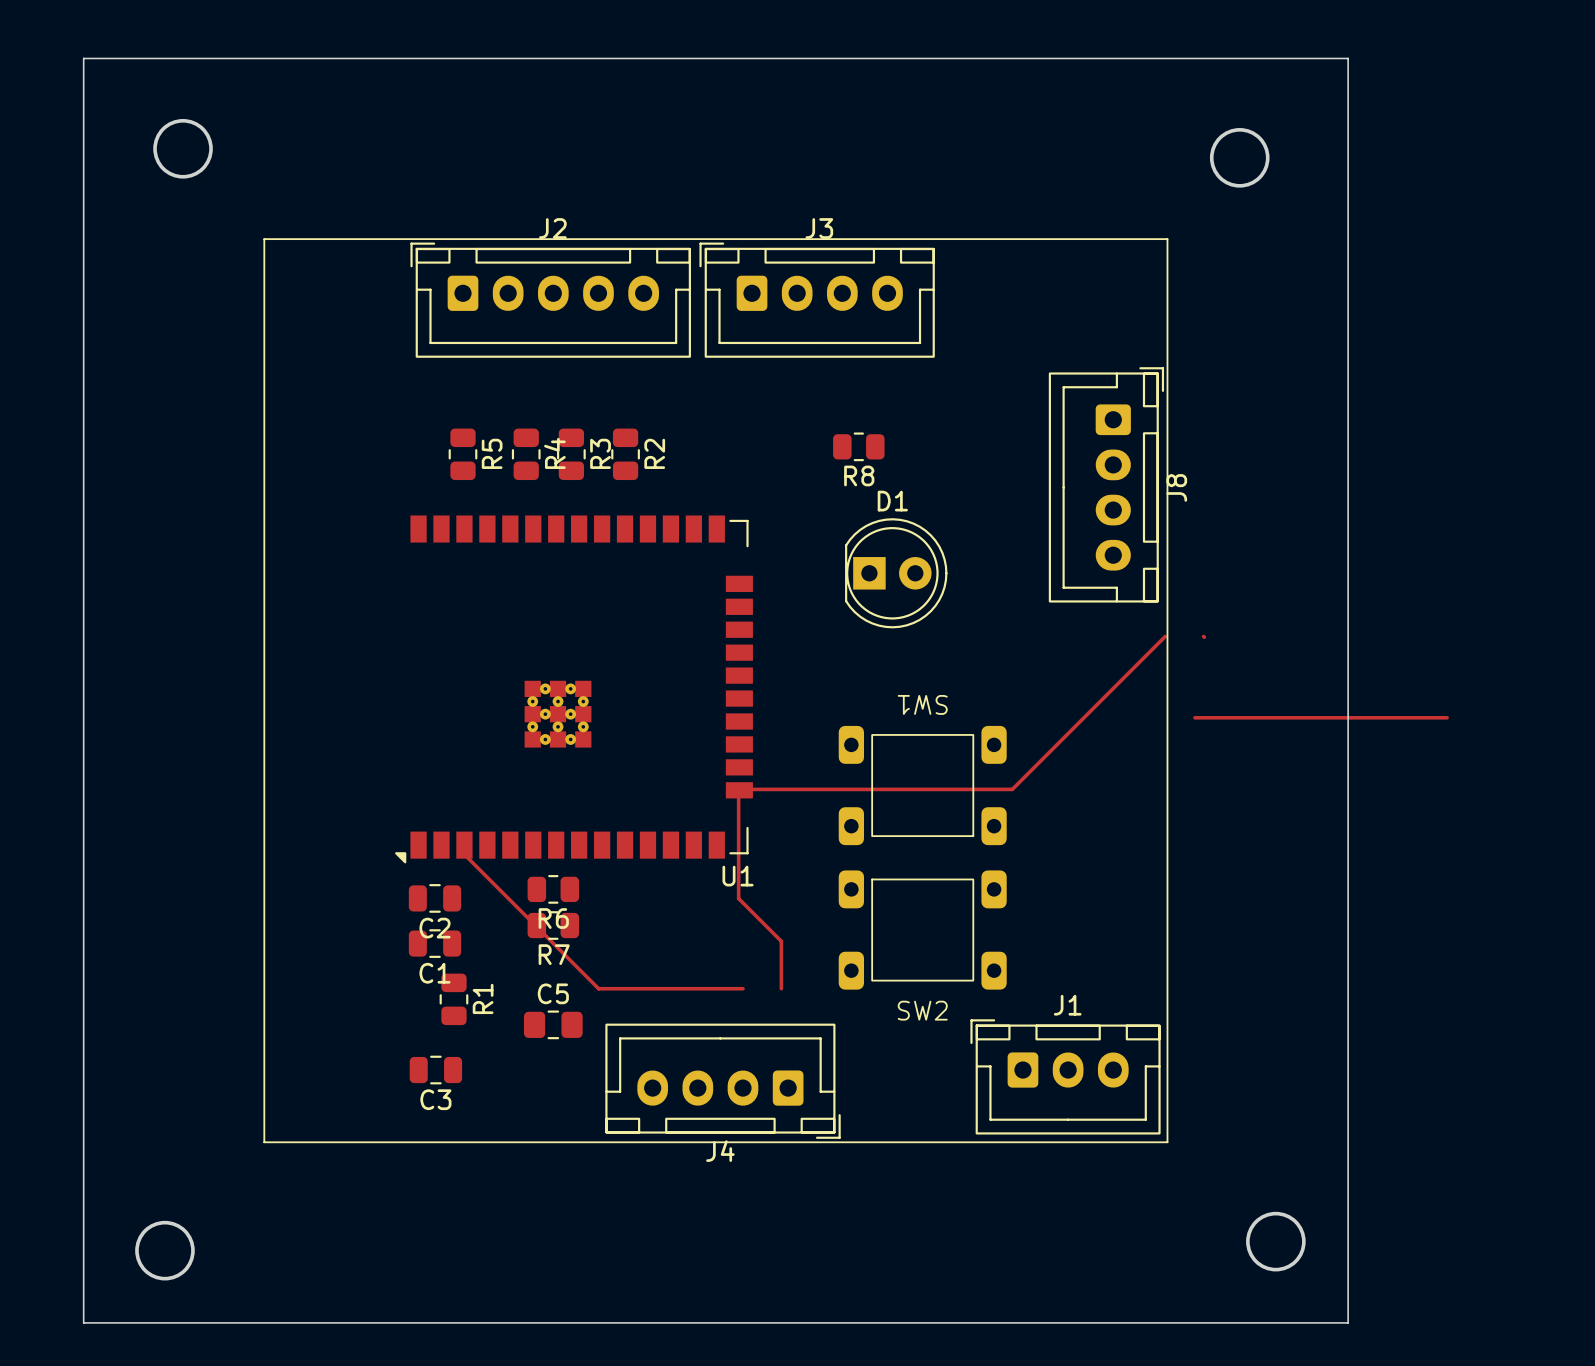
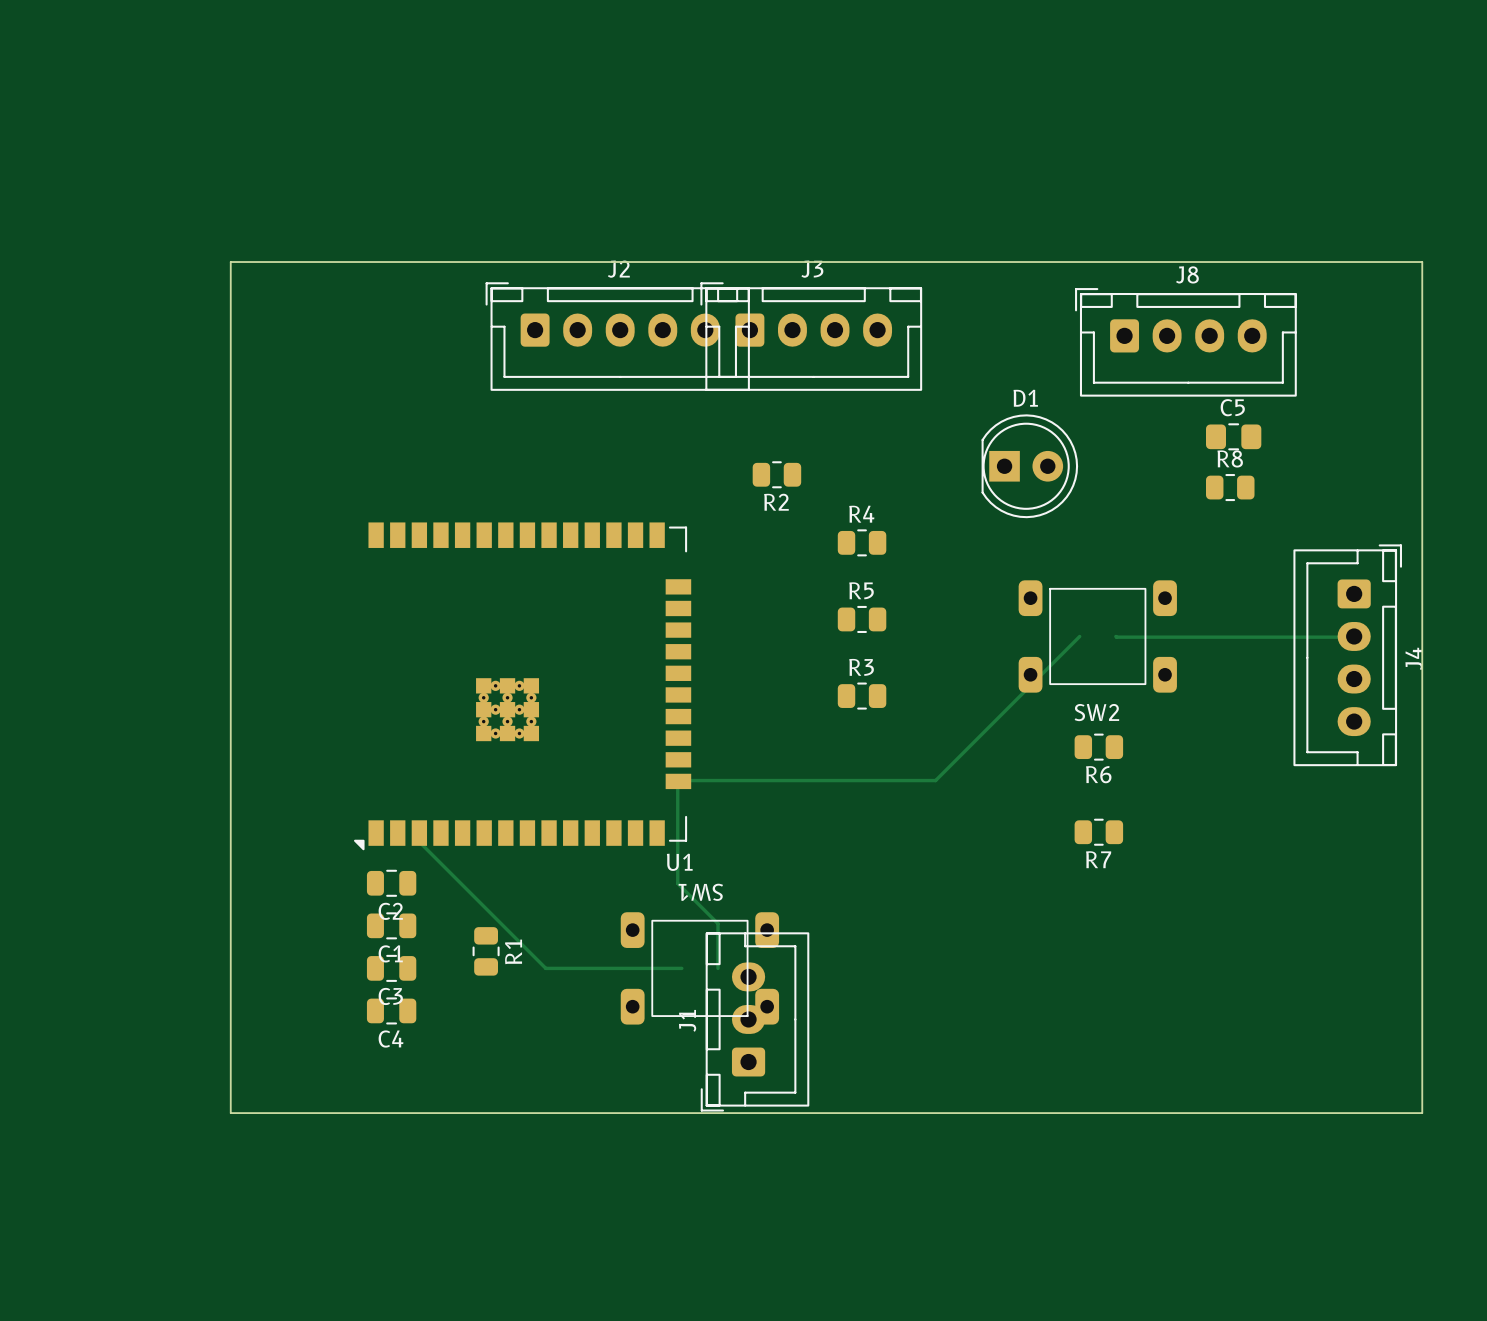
board edge: (83, 58) (1348, 58) (1348, 1322) (83, 1322) (83, 58) -> (230, 262) (230, 1113) (1422, 1113) (1422, 262) (230, 262)
round board edge: [153, 118, 213, 179] -> none
round board edge: [1209, 128, 1270, 188] -> none
line: (264, 239) (1167, 239) (1167, 1142) (264, 1142) (264, 239) -> none
J2 position: (550, 300) -> (617, 336)
J3 position: (817, 300) -> (811, 336)
R8 position: (858, 446) -> (1230, 487)
R5 name position: R5 (492, 453) -> R5 (861, 590)
R4 name position: R4 (554, 453) -> R4 (861, 514)
R3 name position: R3 (600, 453) -> R3 (861, 667)
R5 rotation: 0° (463, 454) -> 90° clockwise (862, 619)
R5 position: (463, 454) -> (862, 619)
R4 rotation: 0° (526, 454) -> 90° clockwise (862, 542)
R4 position: (526, 454) -> (862, 542)
R3 rotation: 0° (571, 454) -> 90° clockwise (862, 696)
R3 position: (571, 454) -> (862, 696)
R2 rotation: 0° (625, 454) -> 90° clockwise (776, 474)
R2 position: (625, 454) -> (776, 474)
R8 name position: R8 (859, 475) -> R8 (1230, 458)
J8 rotation: 0° (1106, 484) -> 90° counterclockwise (1185, 342)
J8 position: (1106, 484) -> (1185, 342)
D1 position: (896, 573) -> (1029, 466)
track: (1194, 717) (1447, 717) -> (1116, 637) (1354, 637)
SW1 position: (922, 785) -> (699, 968)
R6 position: (553, 889) -> (1098, 747)
R7 position: (553, 925) -> (1098, 832)
SW2 position: (922, 930) -> (1097, 636)
R1 position: (453, 999) -> (486, 951)
C5 position: (553, 1024) -> (1233, 436)
C4: none -> (391, 1010)
C3 position: (435, 1070) -> (391, 968)
J1 rotation: 0° (1065, 1076) -> 90° counterclockwise (755, 1021)
J1 position: (1065, 1076) -> (755, 1021)
J4 rotation: 0° (723, 1081) -> 90° counterclockwise (1347, 655)
J4 position: (723, 1081) -> (1347, 655)
round board edge: [1246, 1211, 1306, 1272] -> none
round board edge: [135, 1220, 195, 1281] -> none

